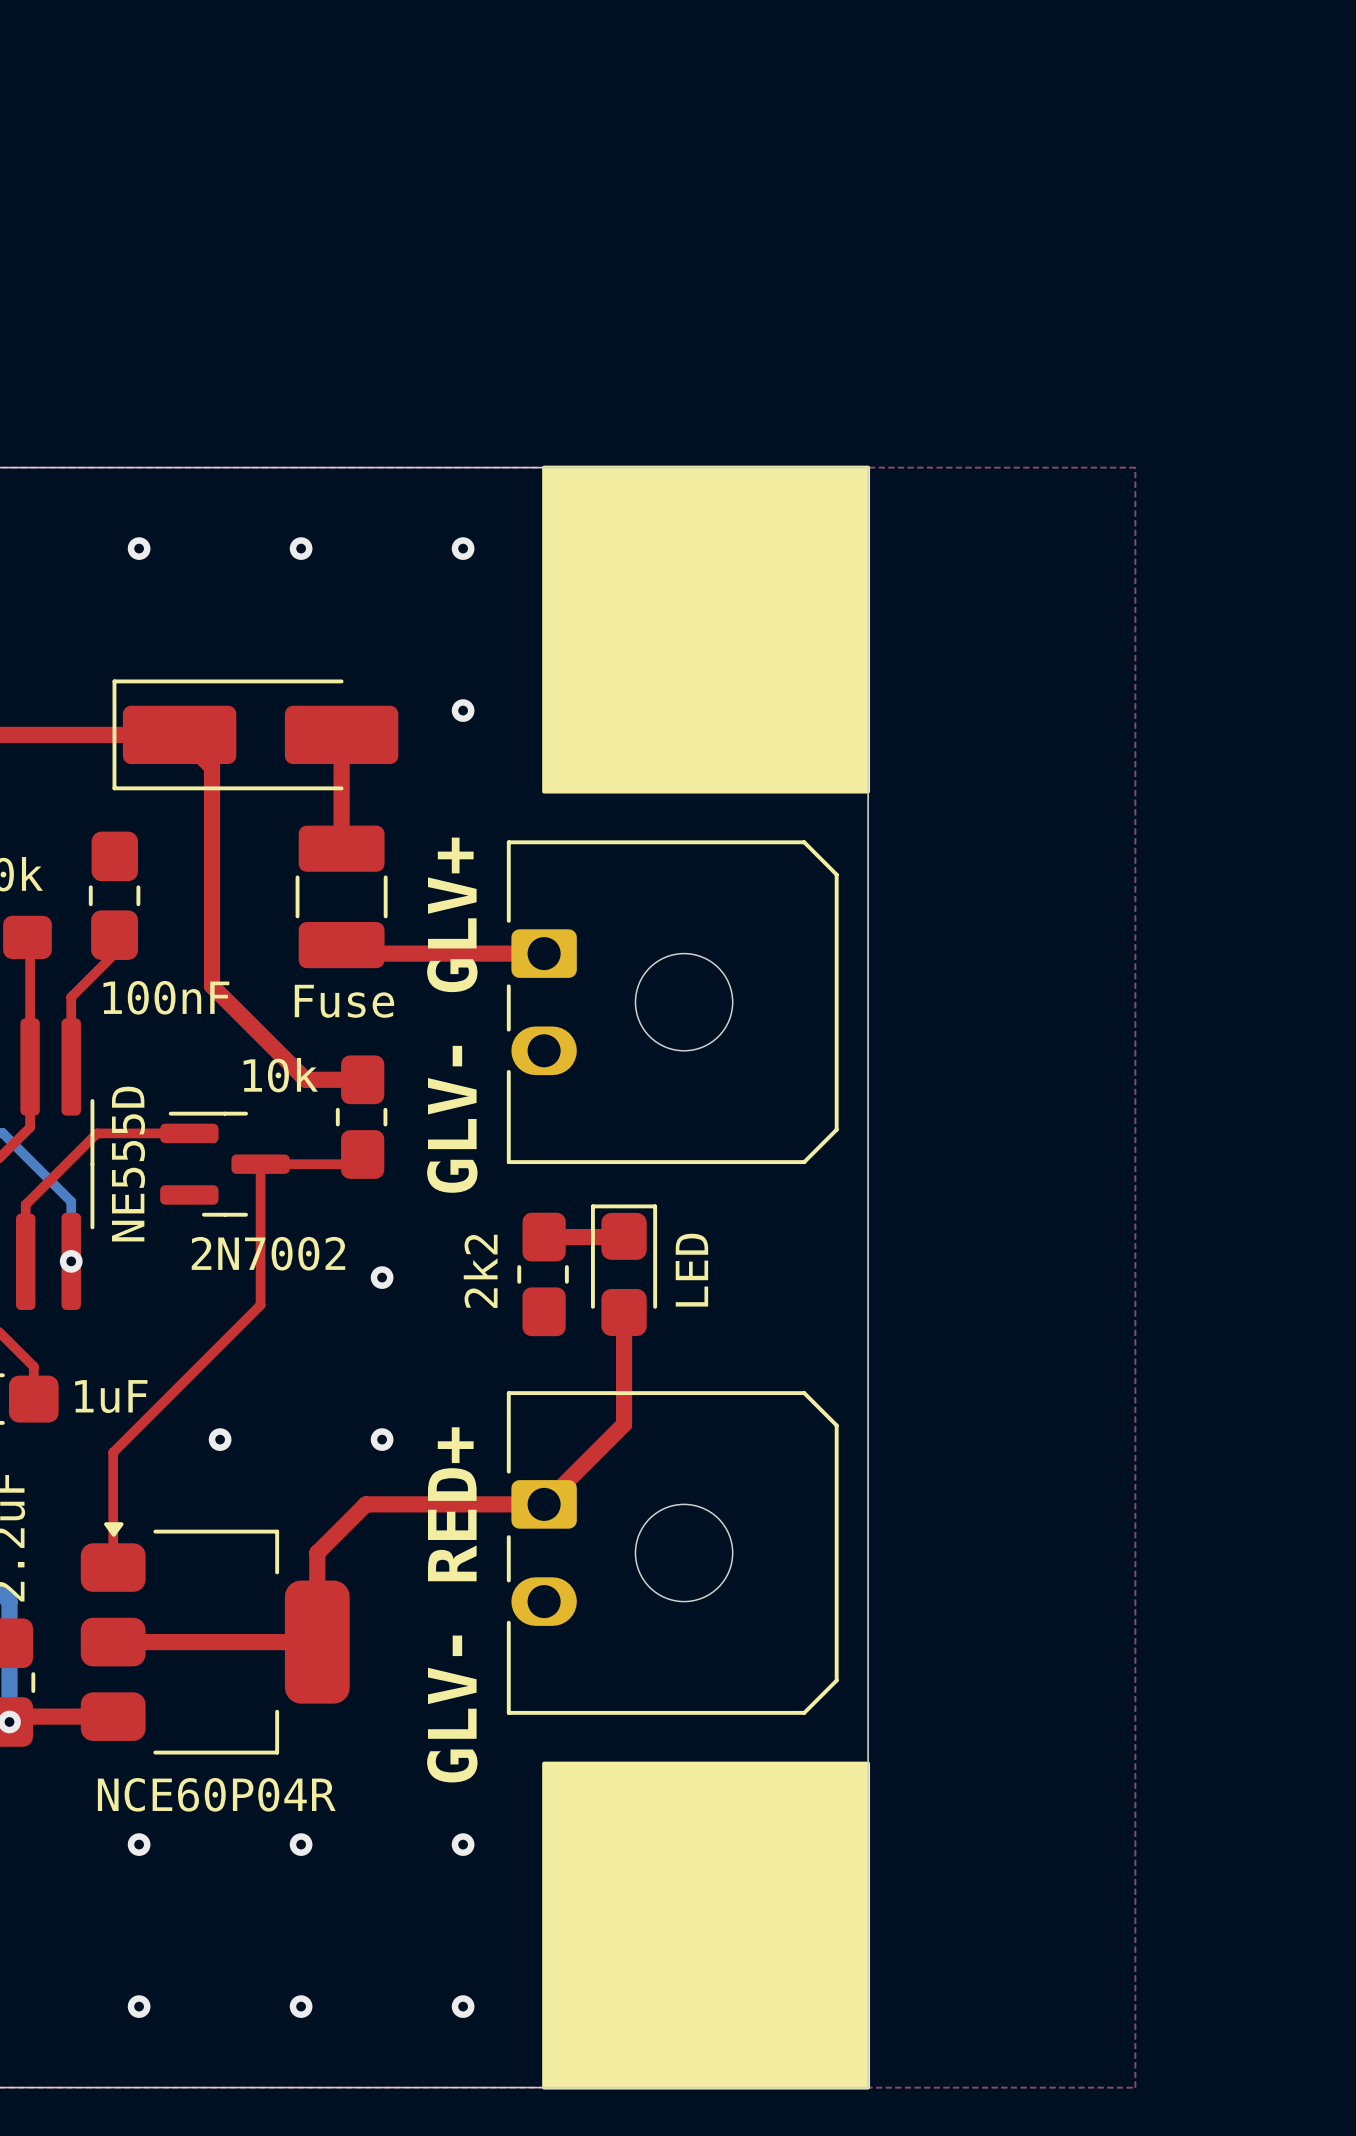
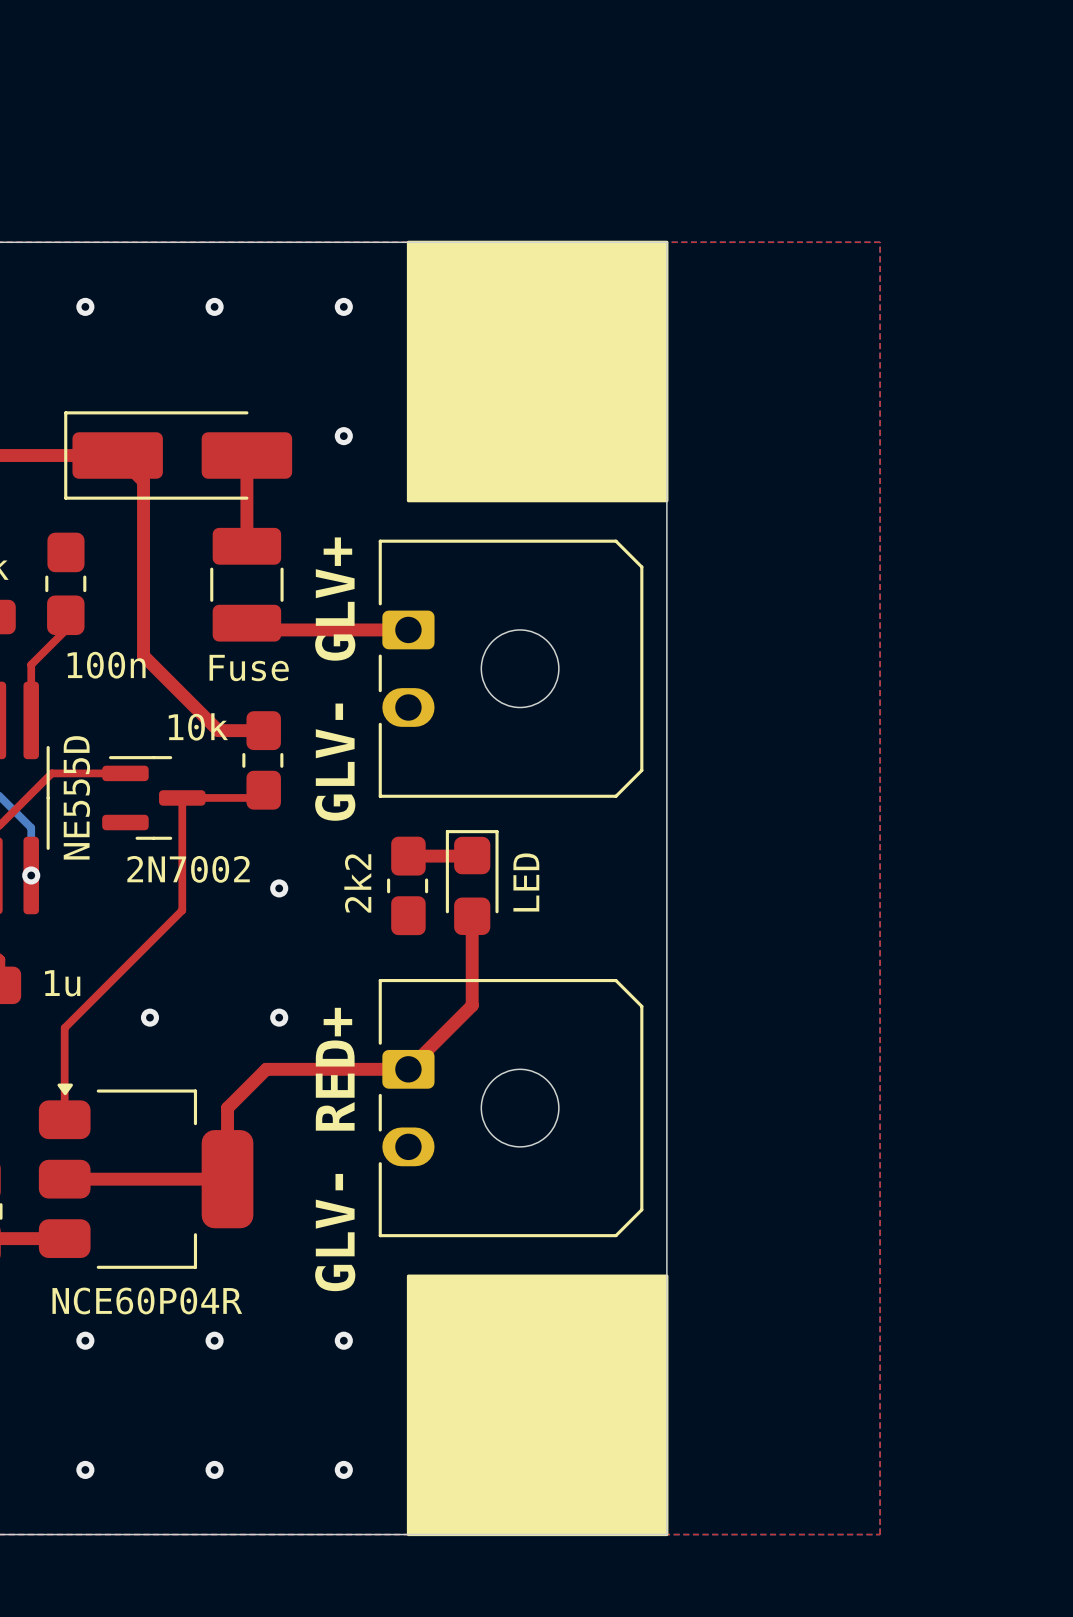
part value: 100nF (166, 997) -> 100n (106, 665)
part value: 1uF (111, 1396) -> 1u (62, 983)

